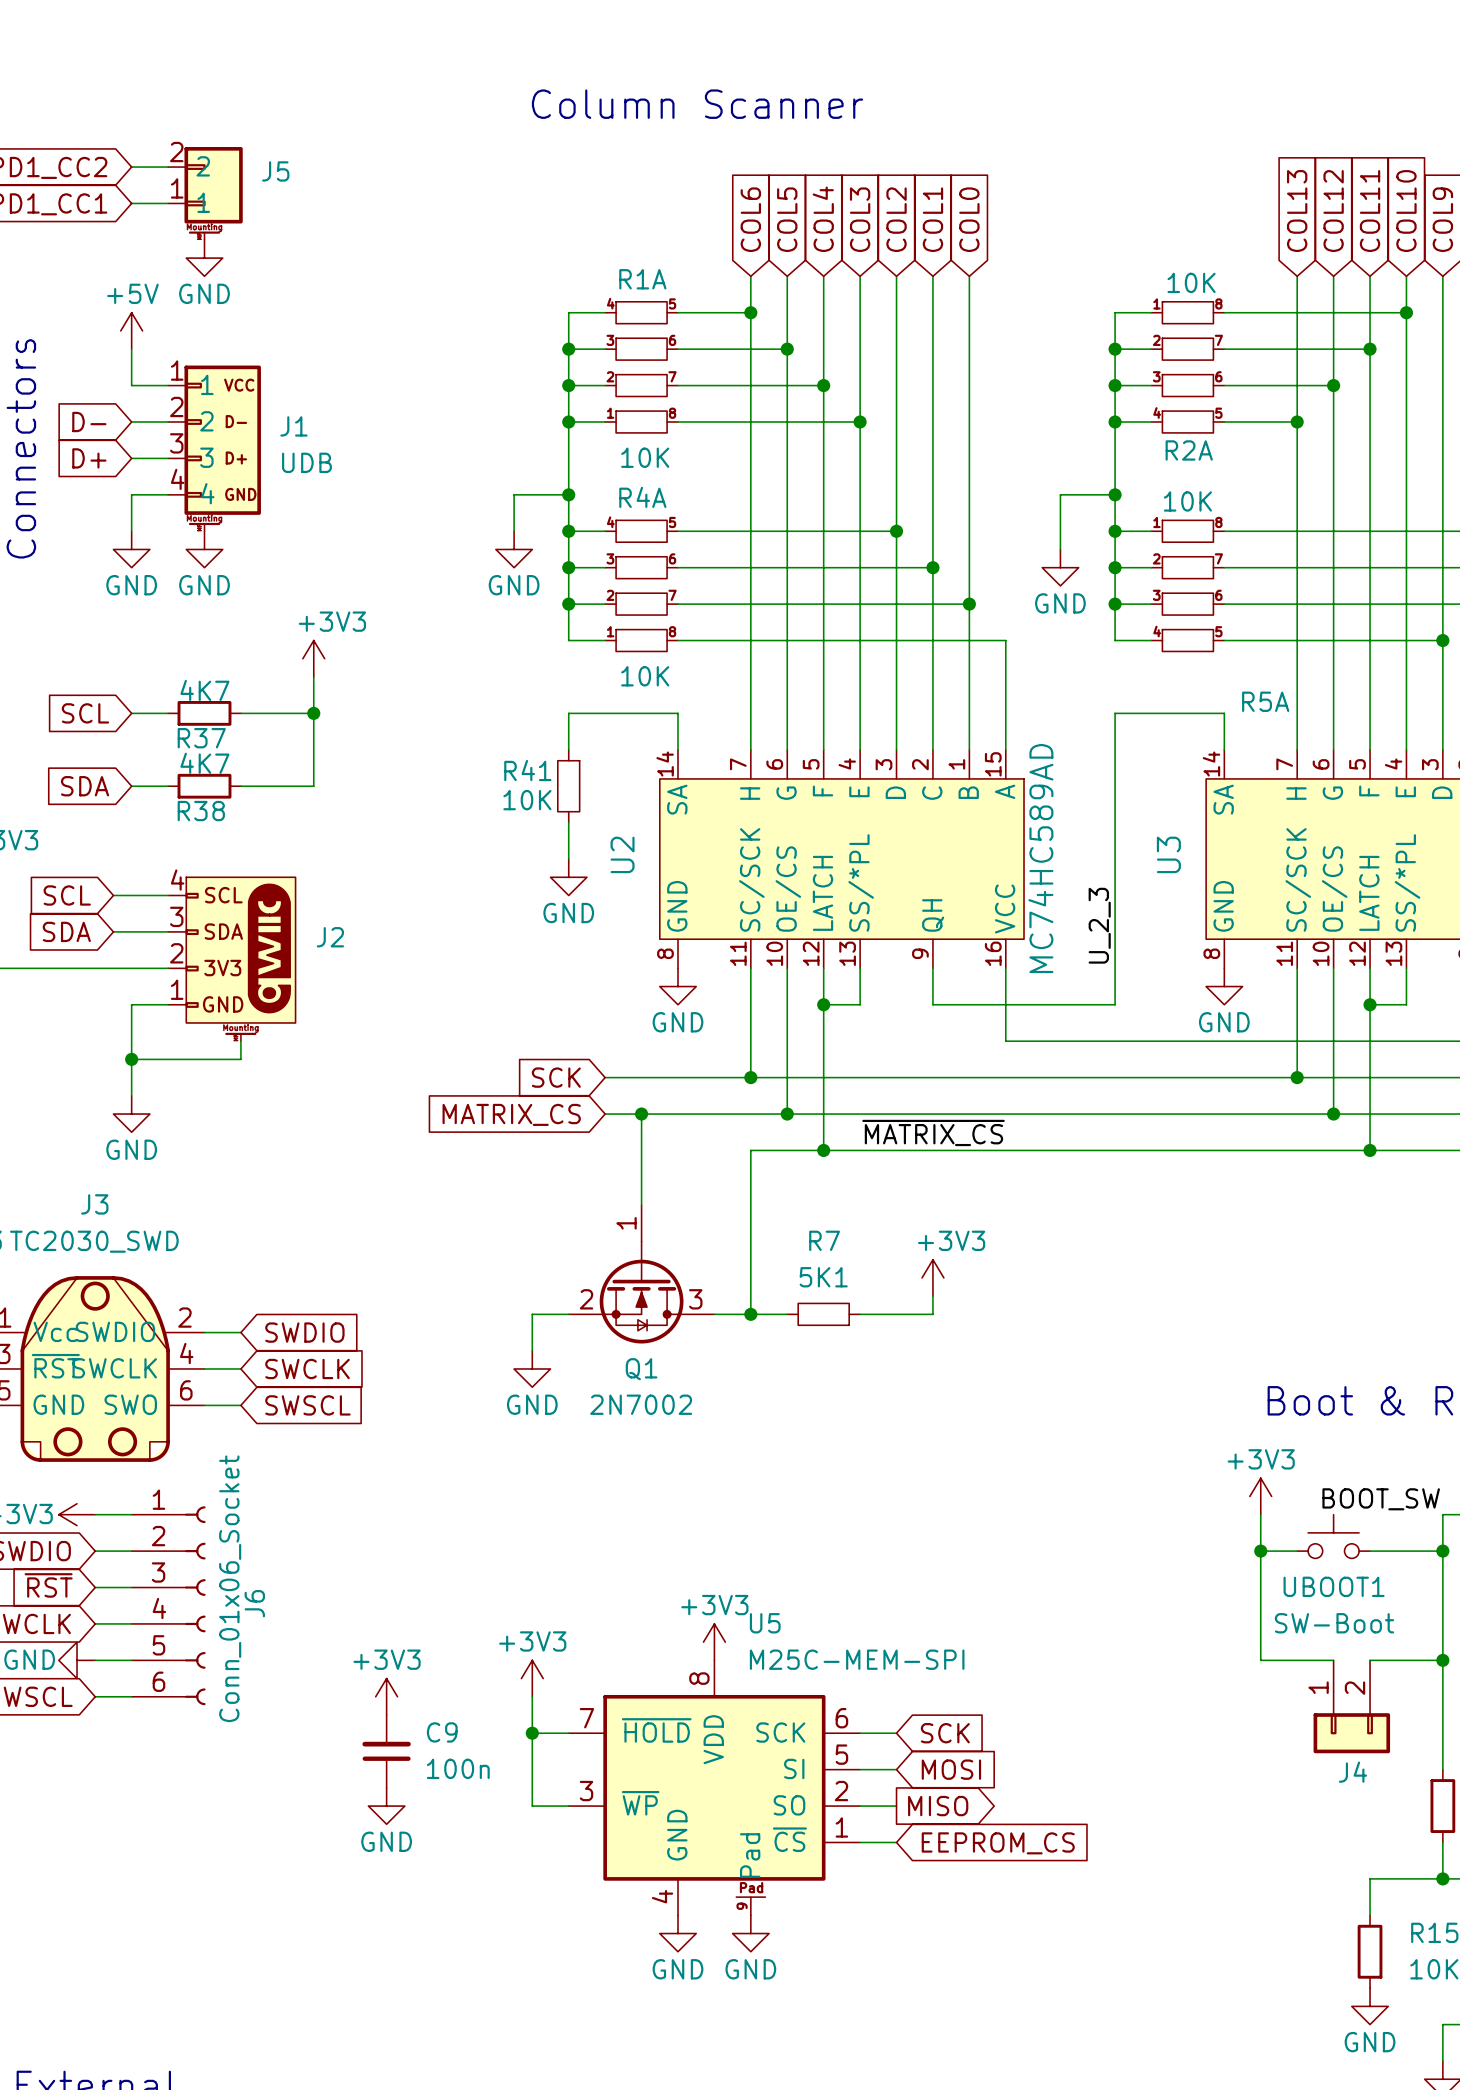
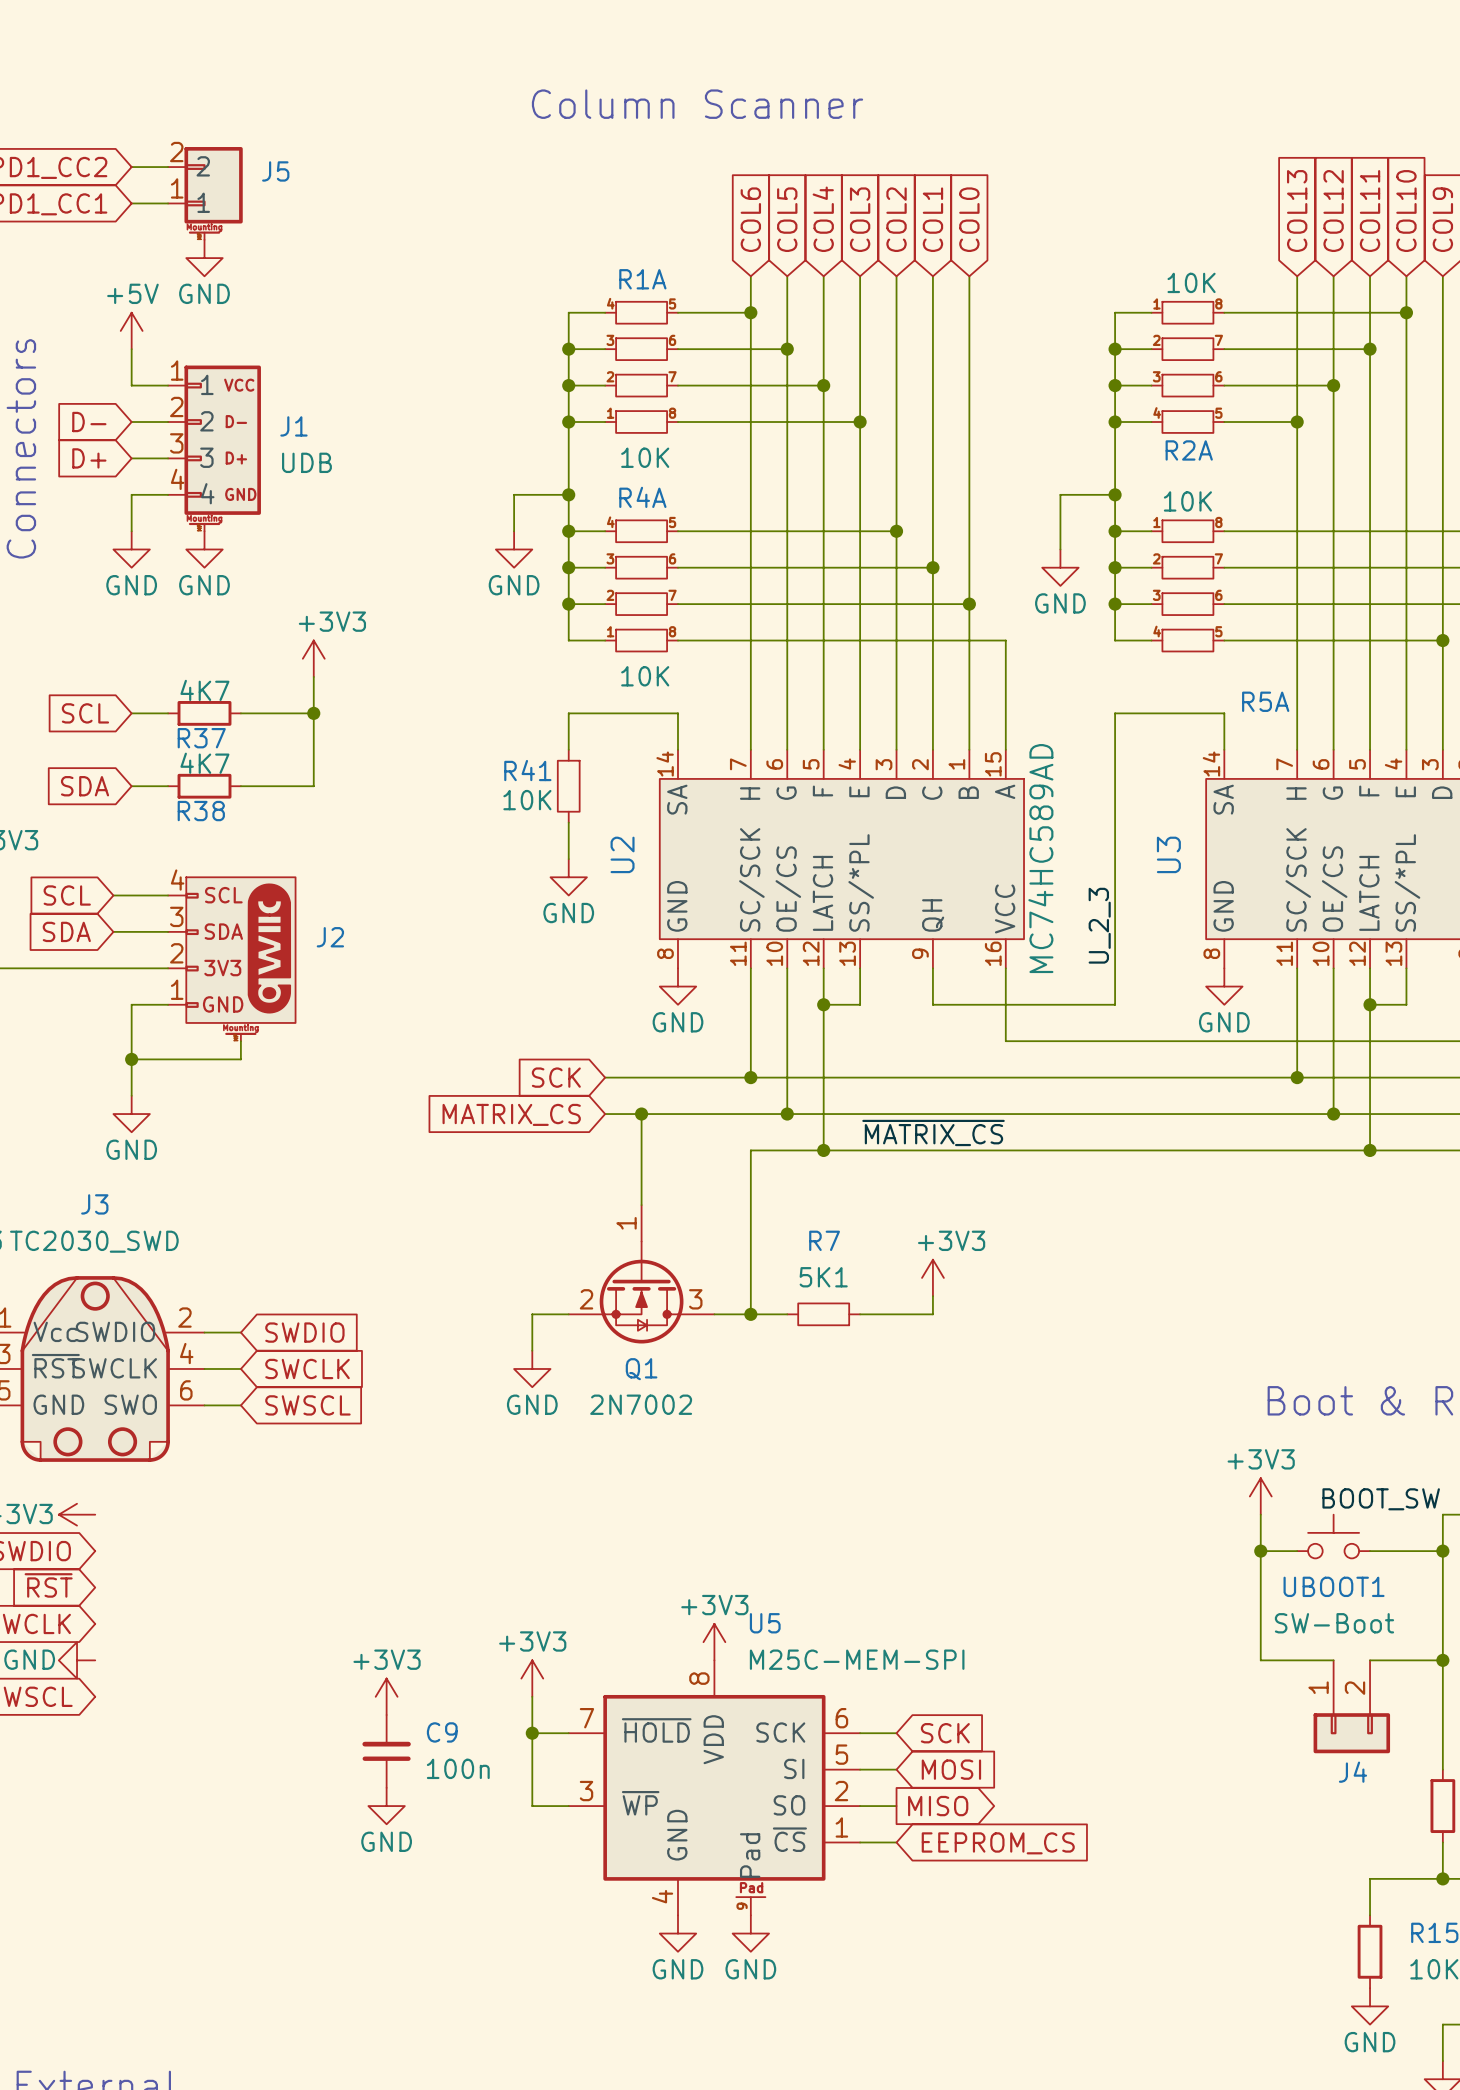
wire: (95, 1514) (131, 1514) -> none
wire: (95, 1551) (131, 1551) -> none
wire: (95, 1587) (131, 1587) -> none
J6: Conn_01x06_Socket (168, 1605) -> none
wire: (95, 1623) (131, 1623) -> none
wire: (95, 1660) (131, 1660) -> none
wire: (95, 1696) (131, 1696) -> none

